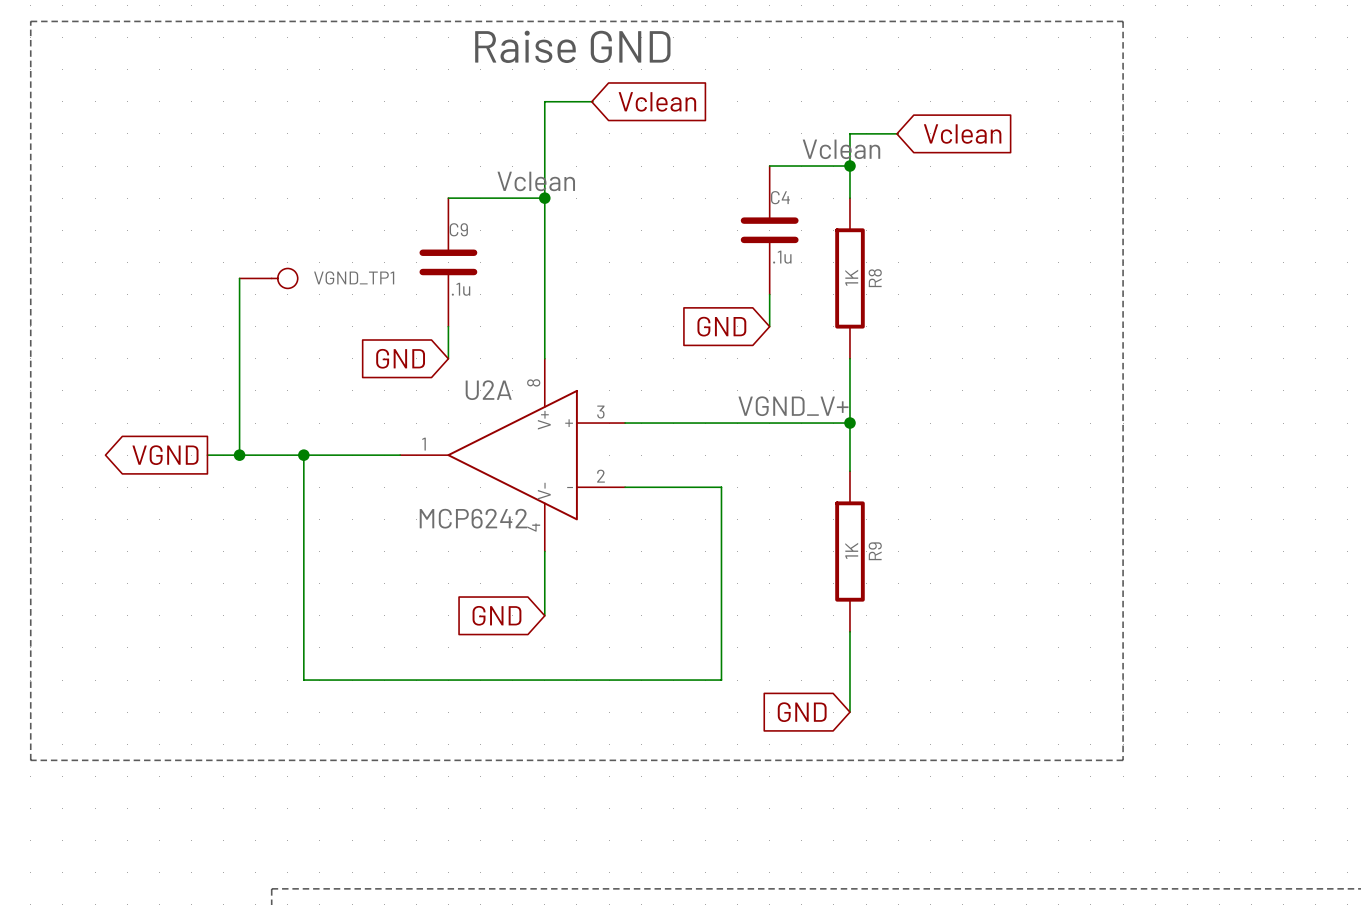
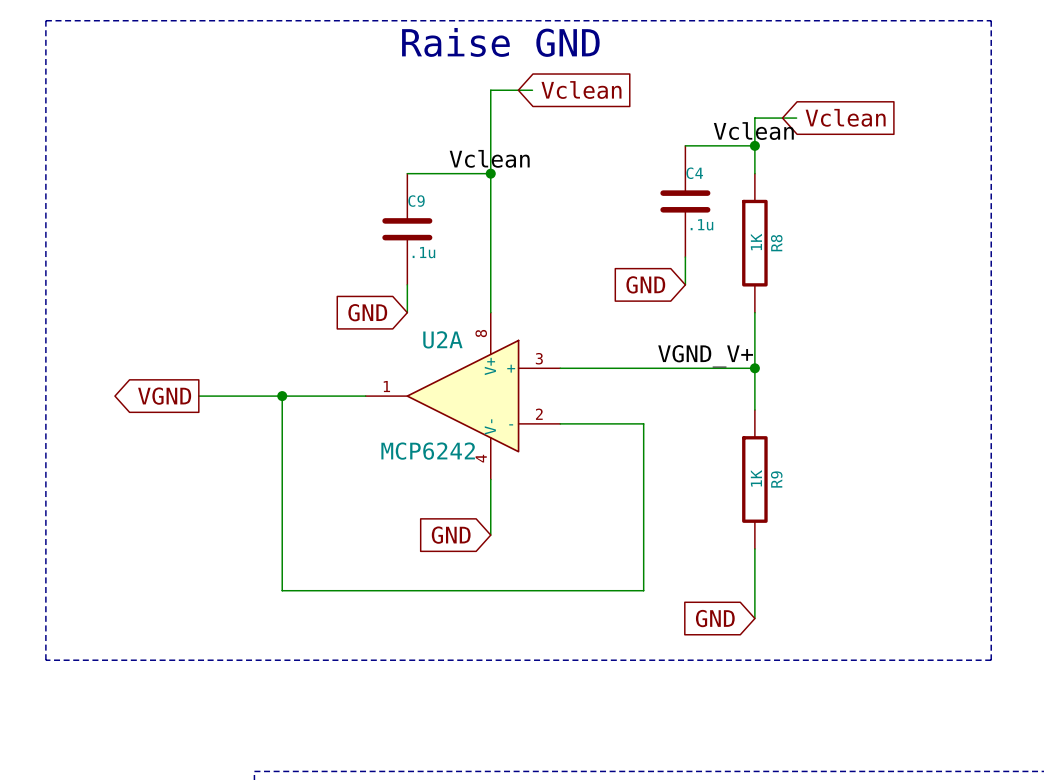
wire: (239, 278) (239, 455) -> none
VGND_TP1: (268, 278) -> none
junction: (239, 455) -> none

